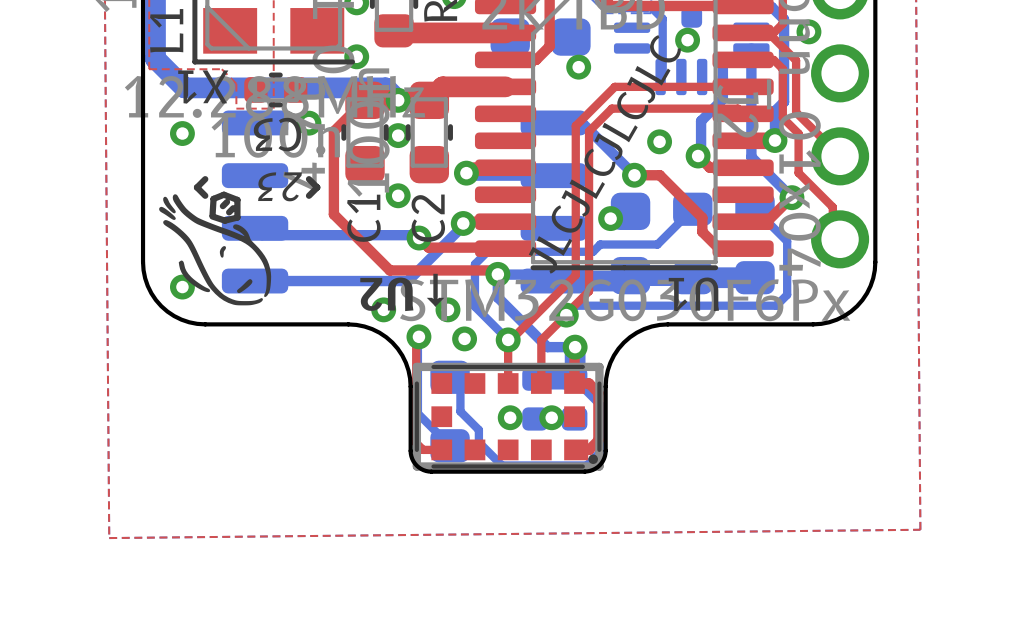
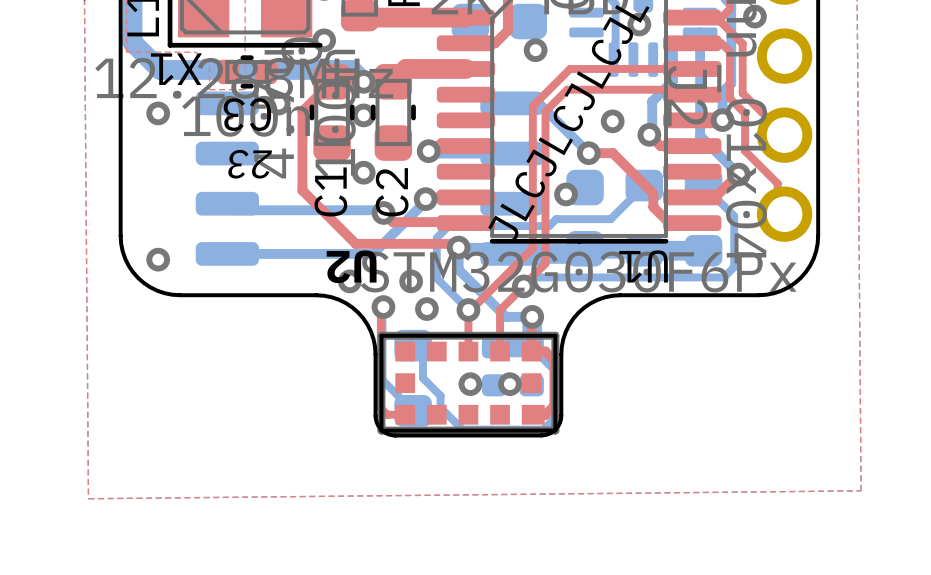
line: (205, 179) (196, 187) (205, 195) -> none
line: (308, 179) (317, 187) (308, 195) -> none
drawing: [159, 194, 272, 306] -> none
line: (227, 201) (222, 206) -> none
line: (233, 208) (229, 212) -> none
line: (212, 215) (213, 198) (223, 194) (237, 199) (237, 217) (224, 220) (212, 216) -> none
text: ↓ (435, 290) -> none
U2 footprint: [412, 362, 604, 471] -> [377, 331, 560, 435]

